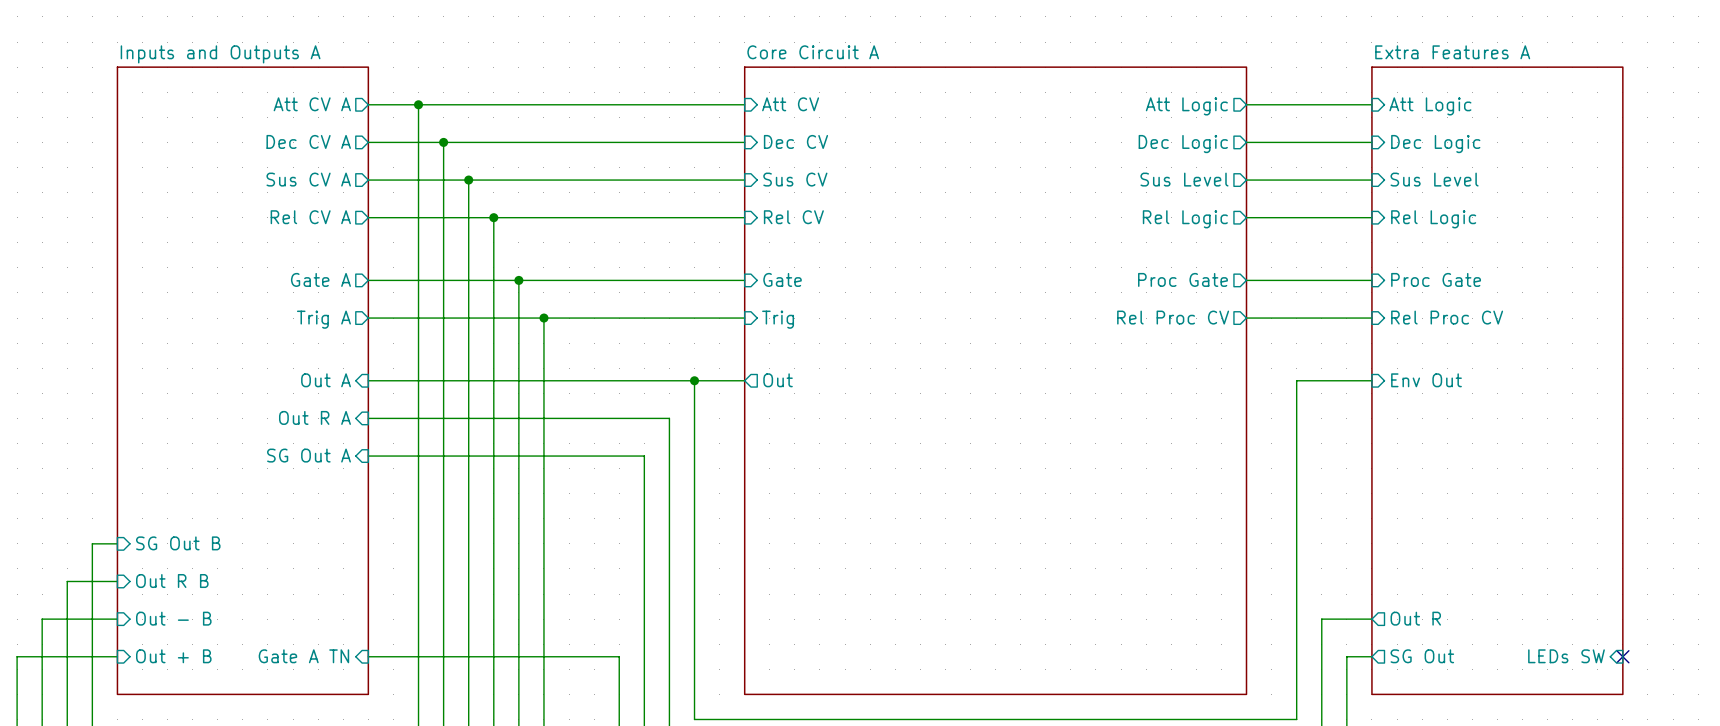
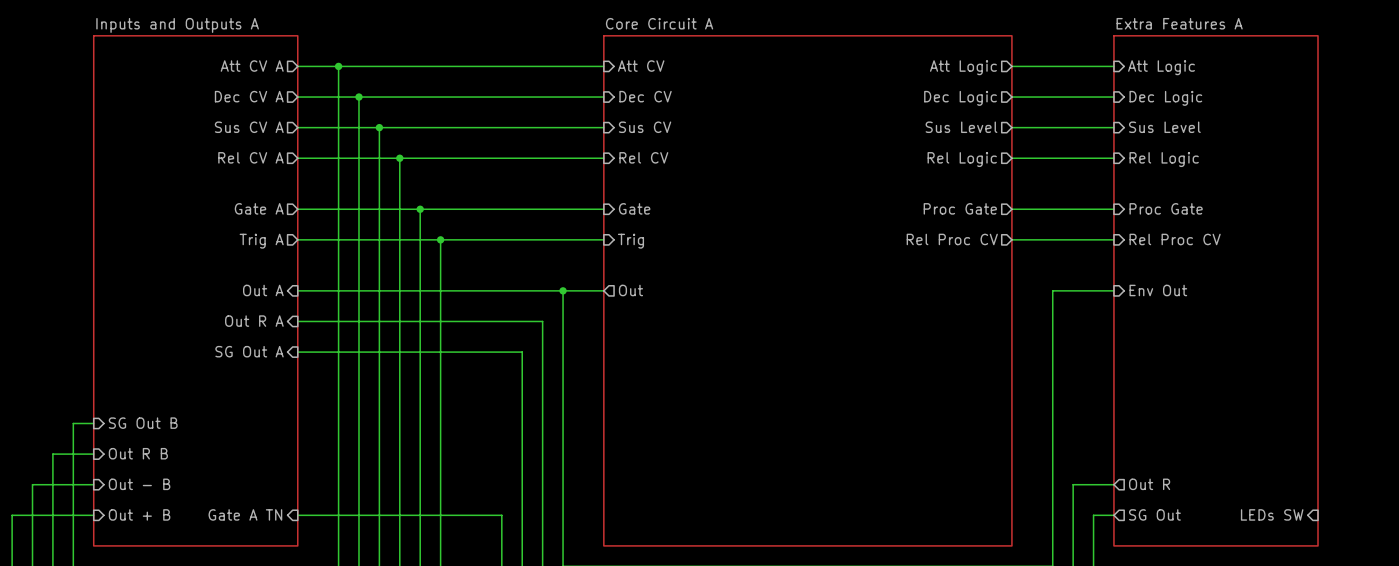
no-connect mark: (1622, 656) -> none

